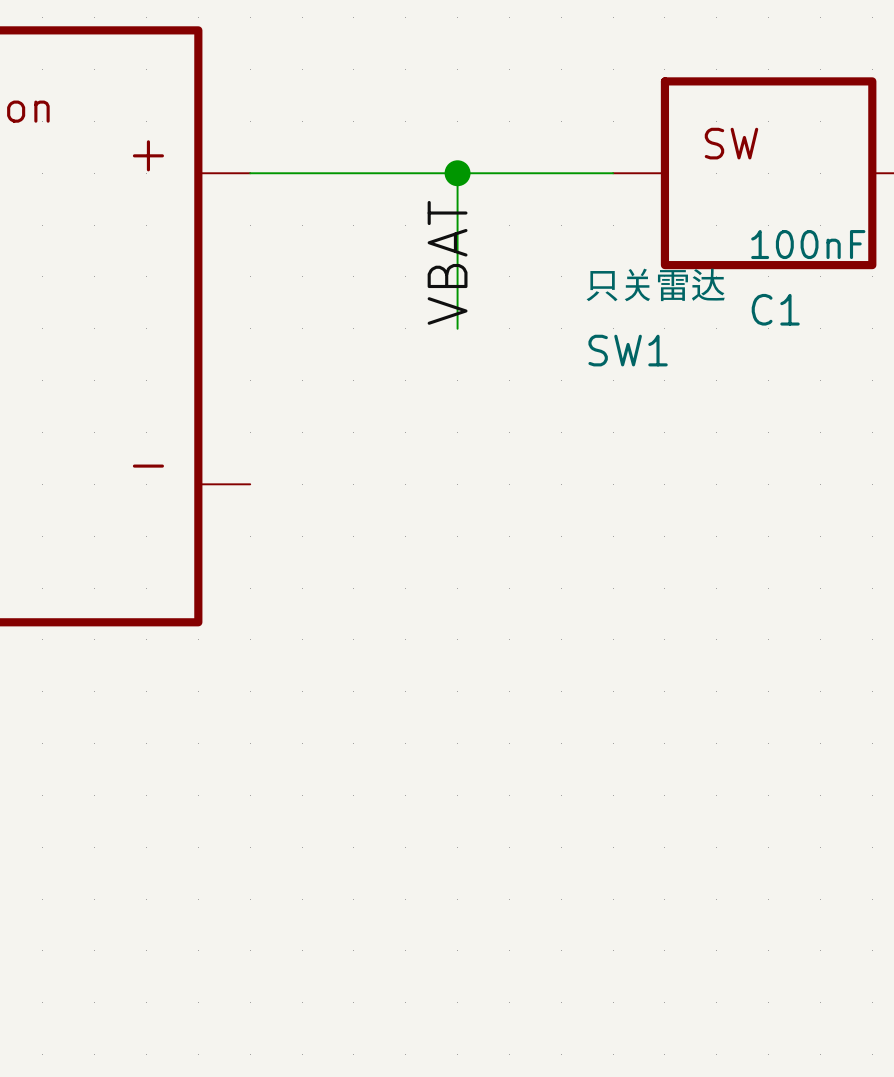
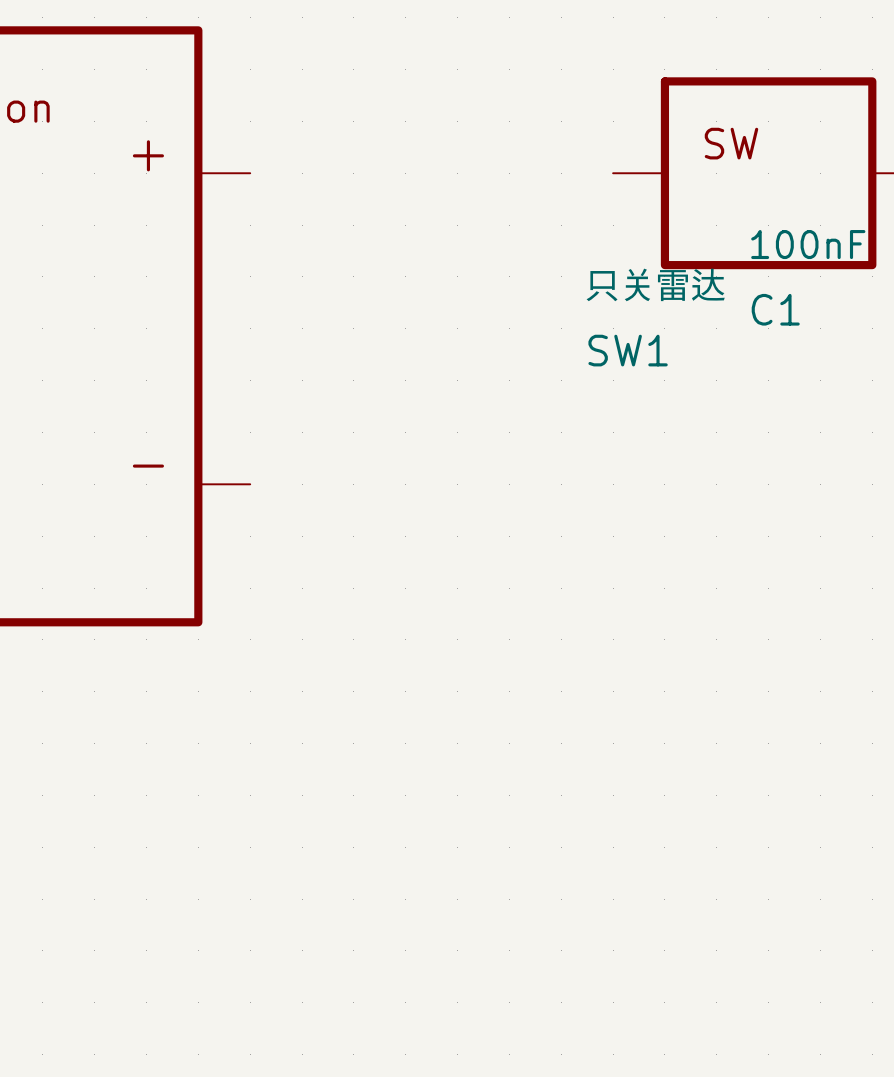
wire: (250, 173) (613, 173) -> none
wire: (457, 173) (457, 328) -> none
junction: (457, 173) -> none
label: VBAT (447, 262) -> none

